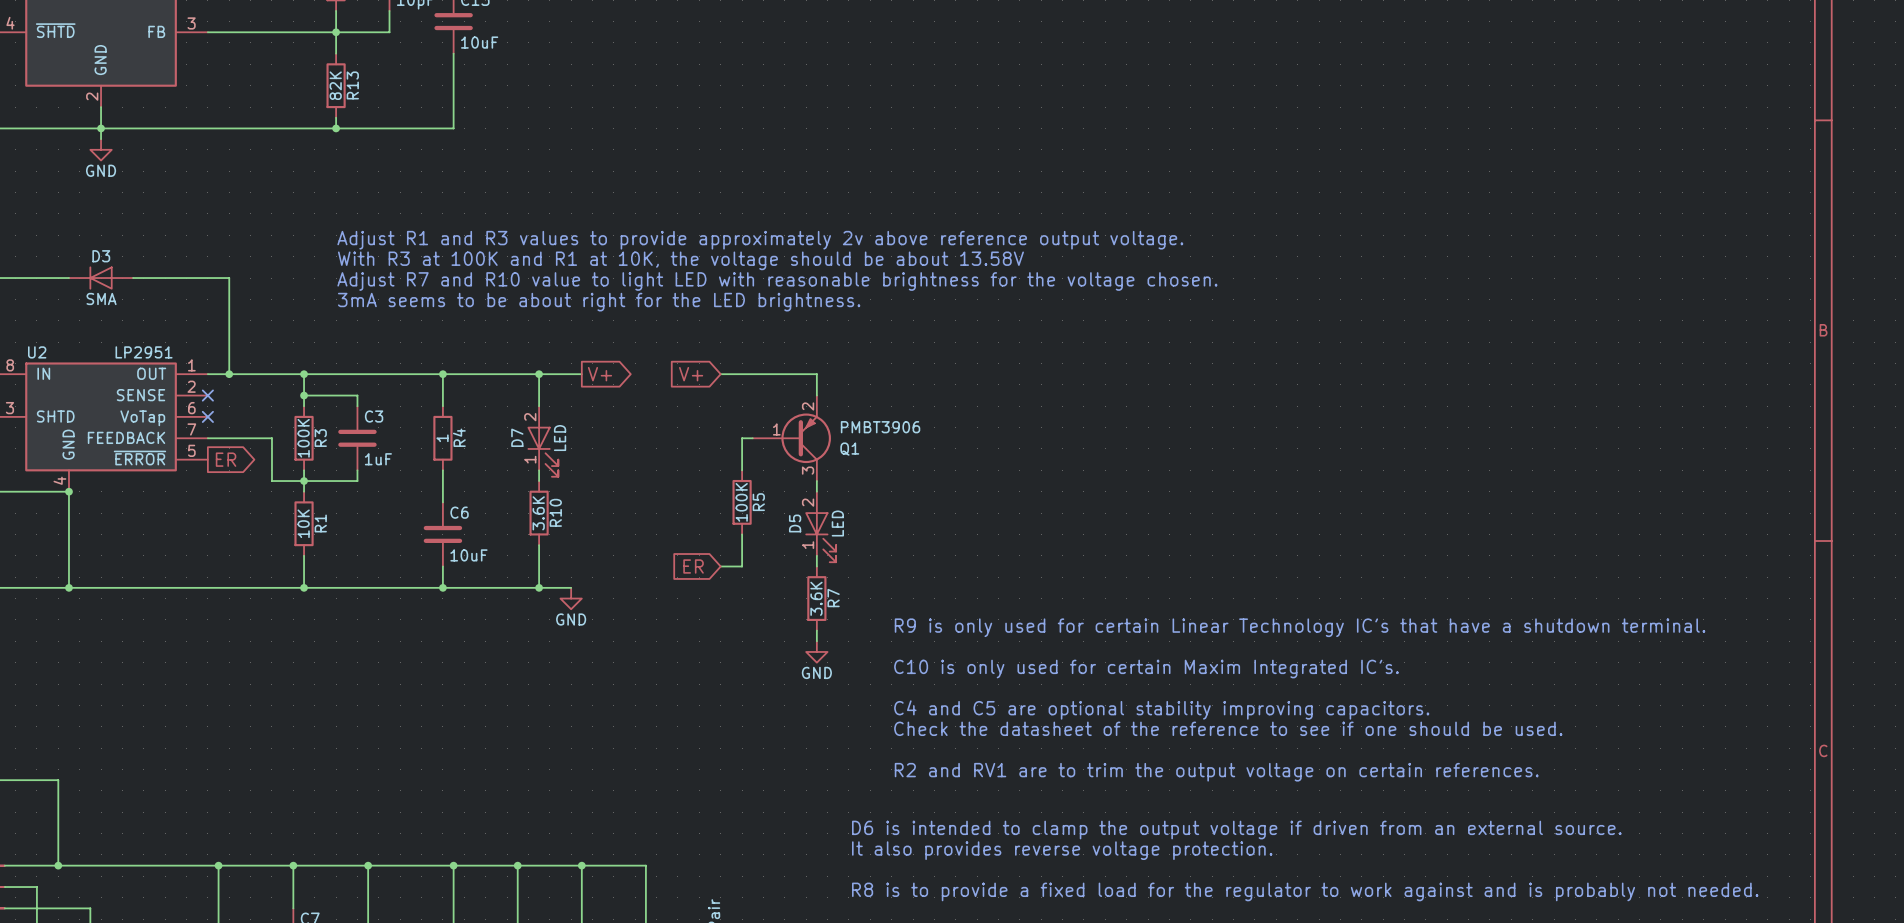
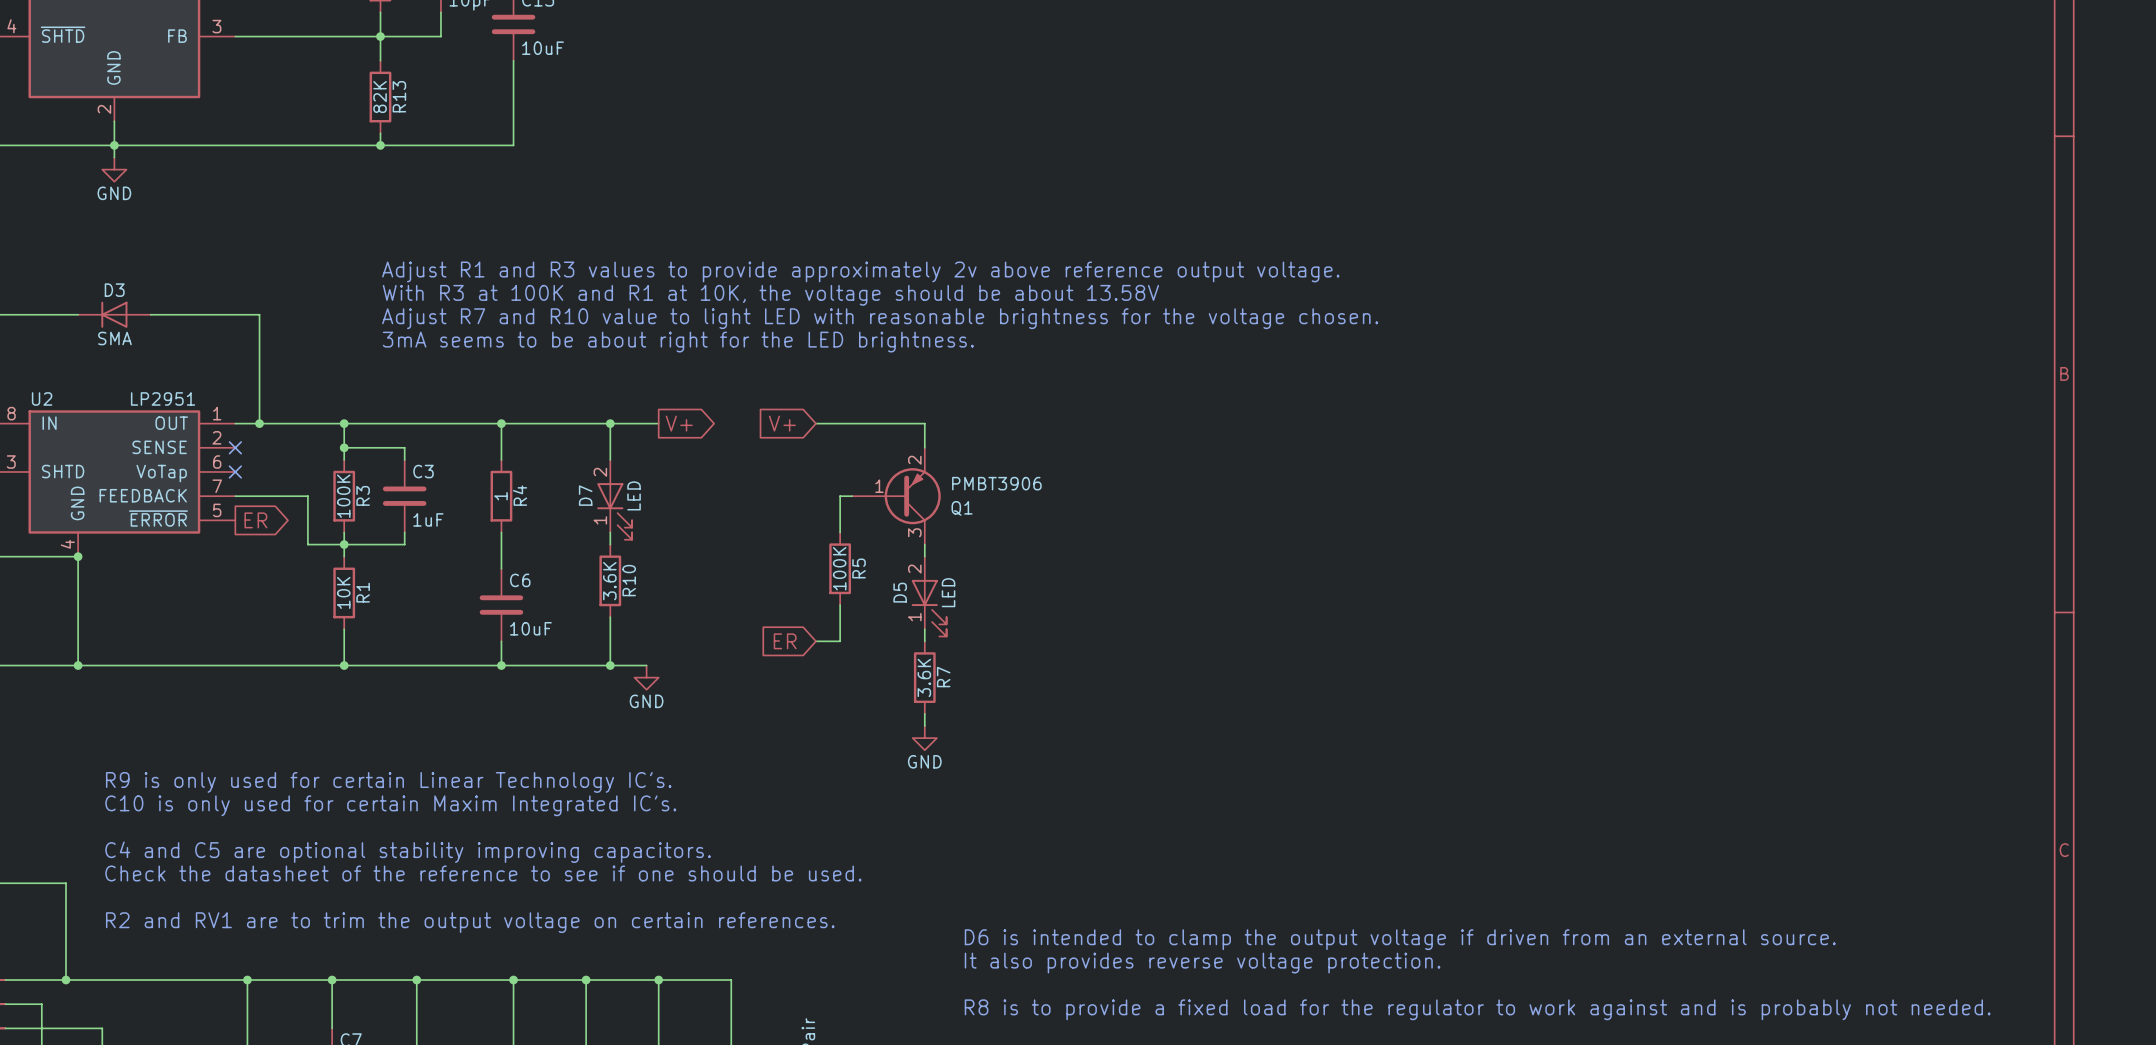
text: R9 is only used for certain Linear Technology IC's that have a shutdown terminal. (1300, 627) -> none
text: C10 is only used for certain Maxim Integrated IC's. (1146, 669) -> none
text: none -> R9 is only used for certain Linear Technology IC's. (388, 782)
text: C4 and C5 are optional stability improving capacitors. (1161, 710) -> none
text: none -> C10 is only used for certain Maxim Integrated IC's. (390, 805)
text: Check the datasheet of the reference to see if one should be used. (1228, 728) -> none
text: none -> C4 and C5 are optional stability improving capacitors. (408, 852)
text: none -> Check the datasheet of the reference to see if one should be used. (483, 873)
text: R2 and RV1 are to trim the output voltage on certain references. (1216, 772) -> none
text: none -> R2 and RV1 are to trim the output voltage on certain references. (470, 922)

